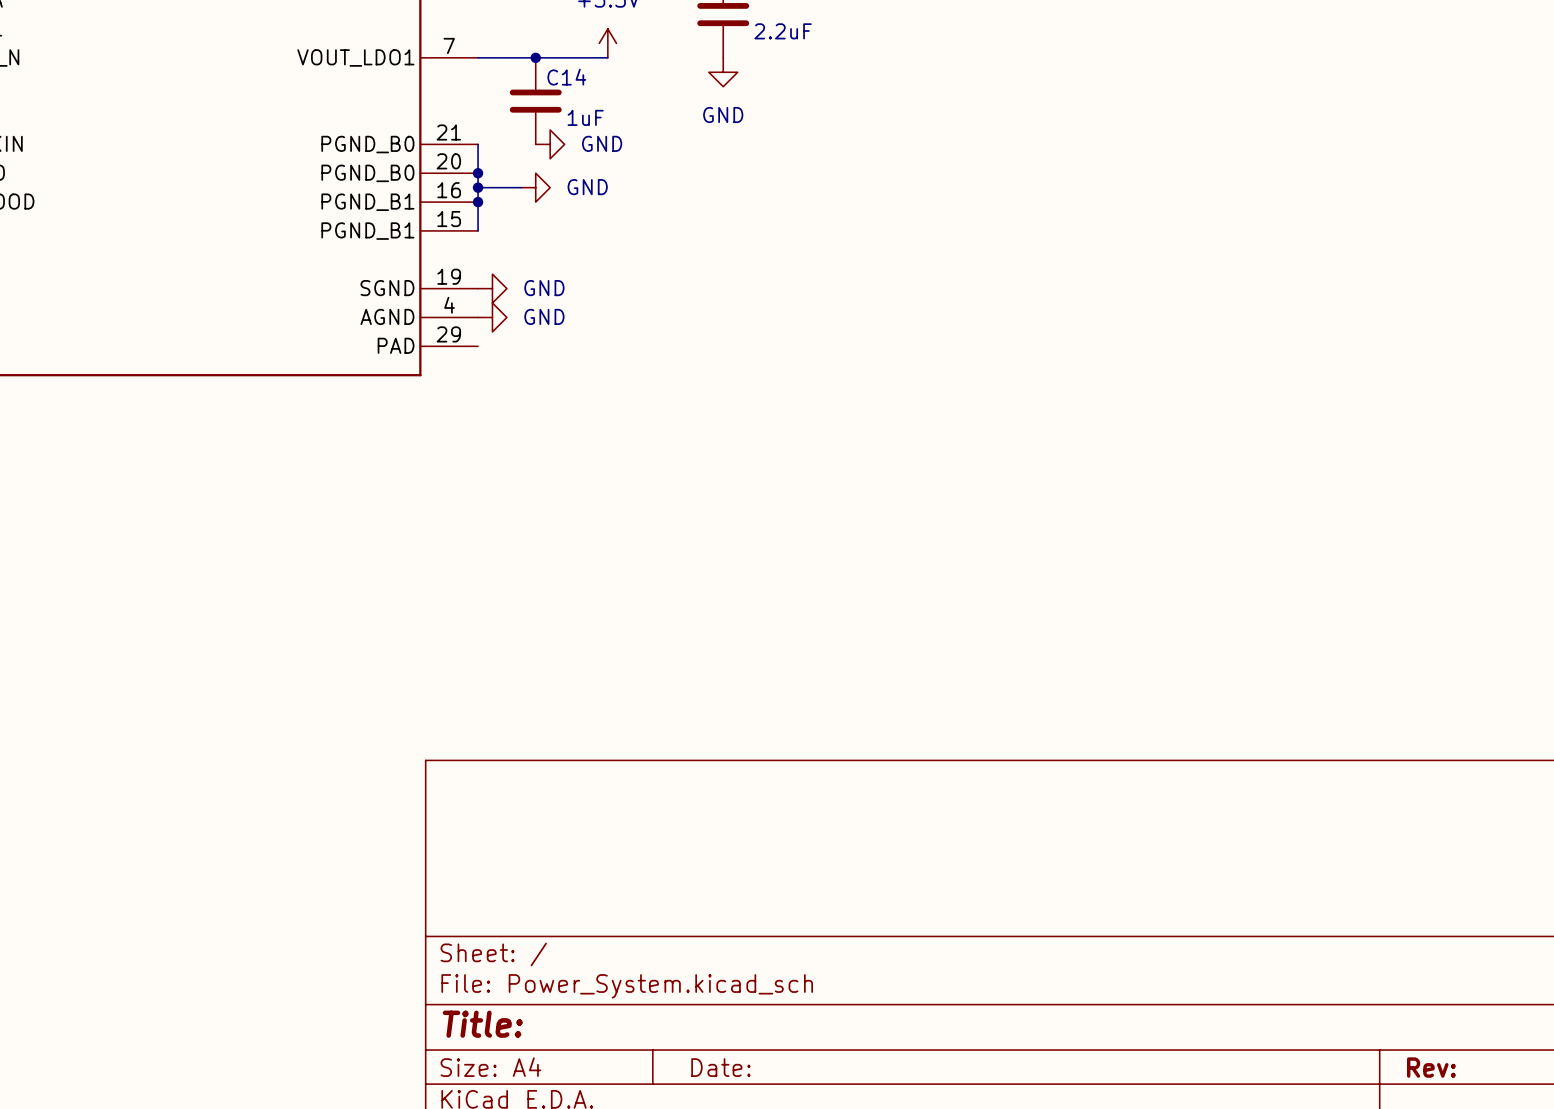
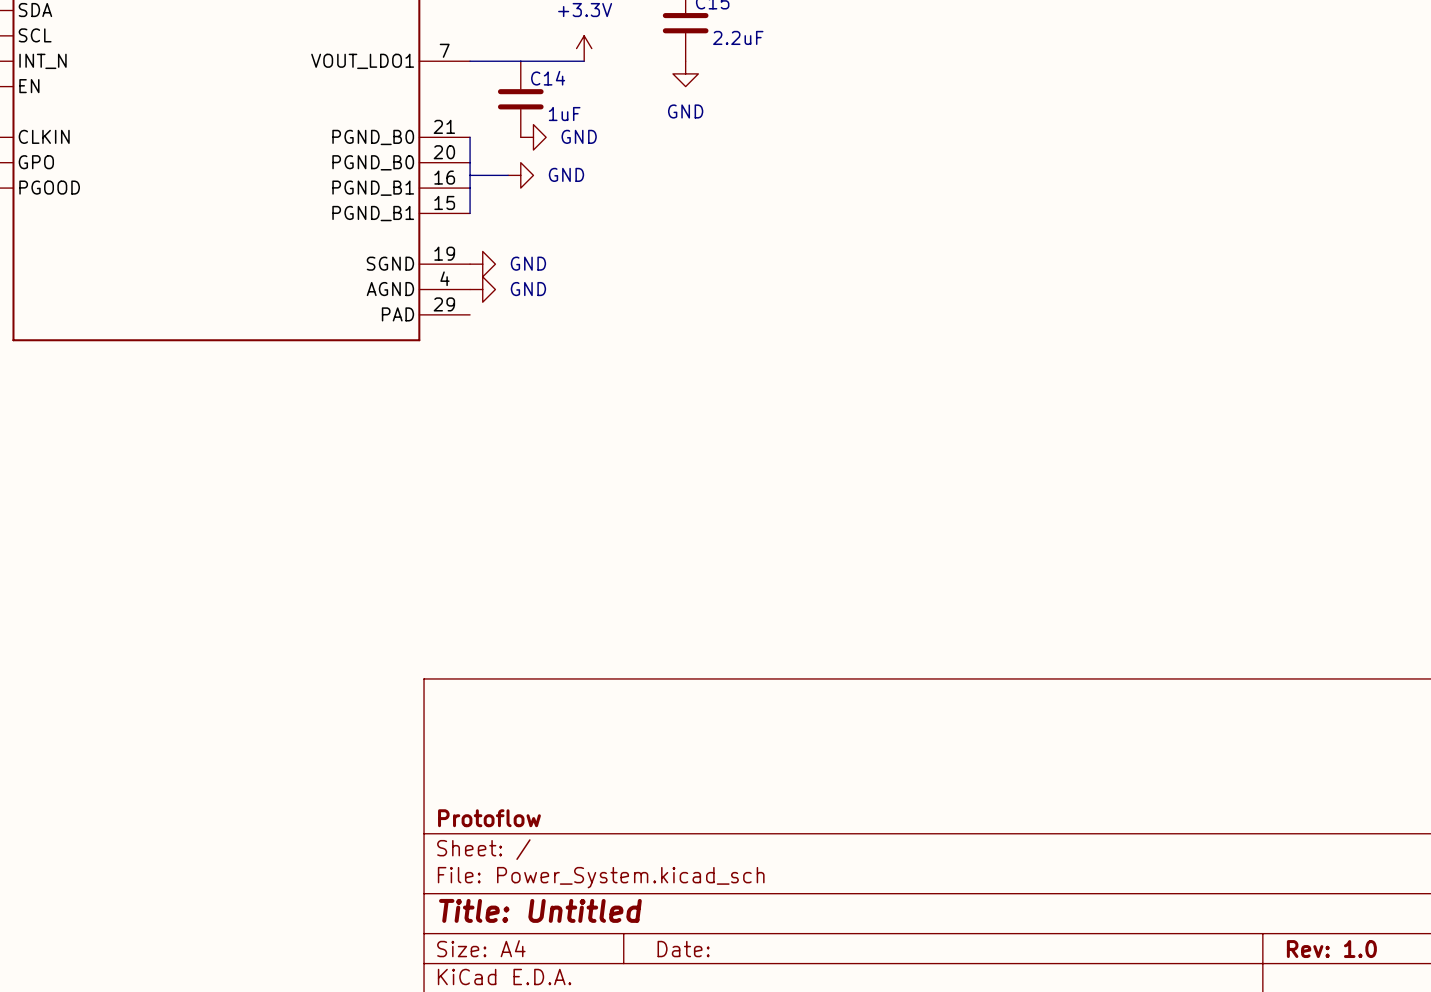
junction: (535, 57) -> none
junction: (478, 173) -> none
junction: (478, 187) -> none
junction: (478, 202) -> none
title block: none -> Protoflow (489, 818)
title block: Title: (482, 1024) -> Title: Untitled (540, 910)
title block: Rev: (1431, 1067) -> Rev: 1.0 (1331, 949)

